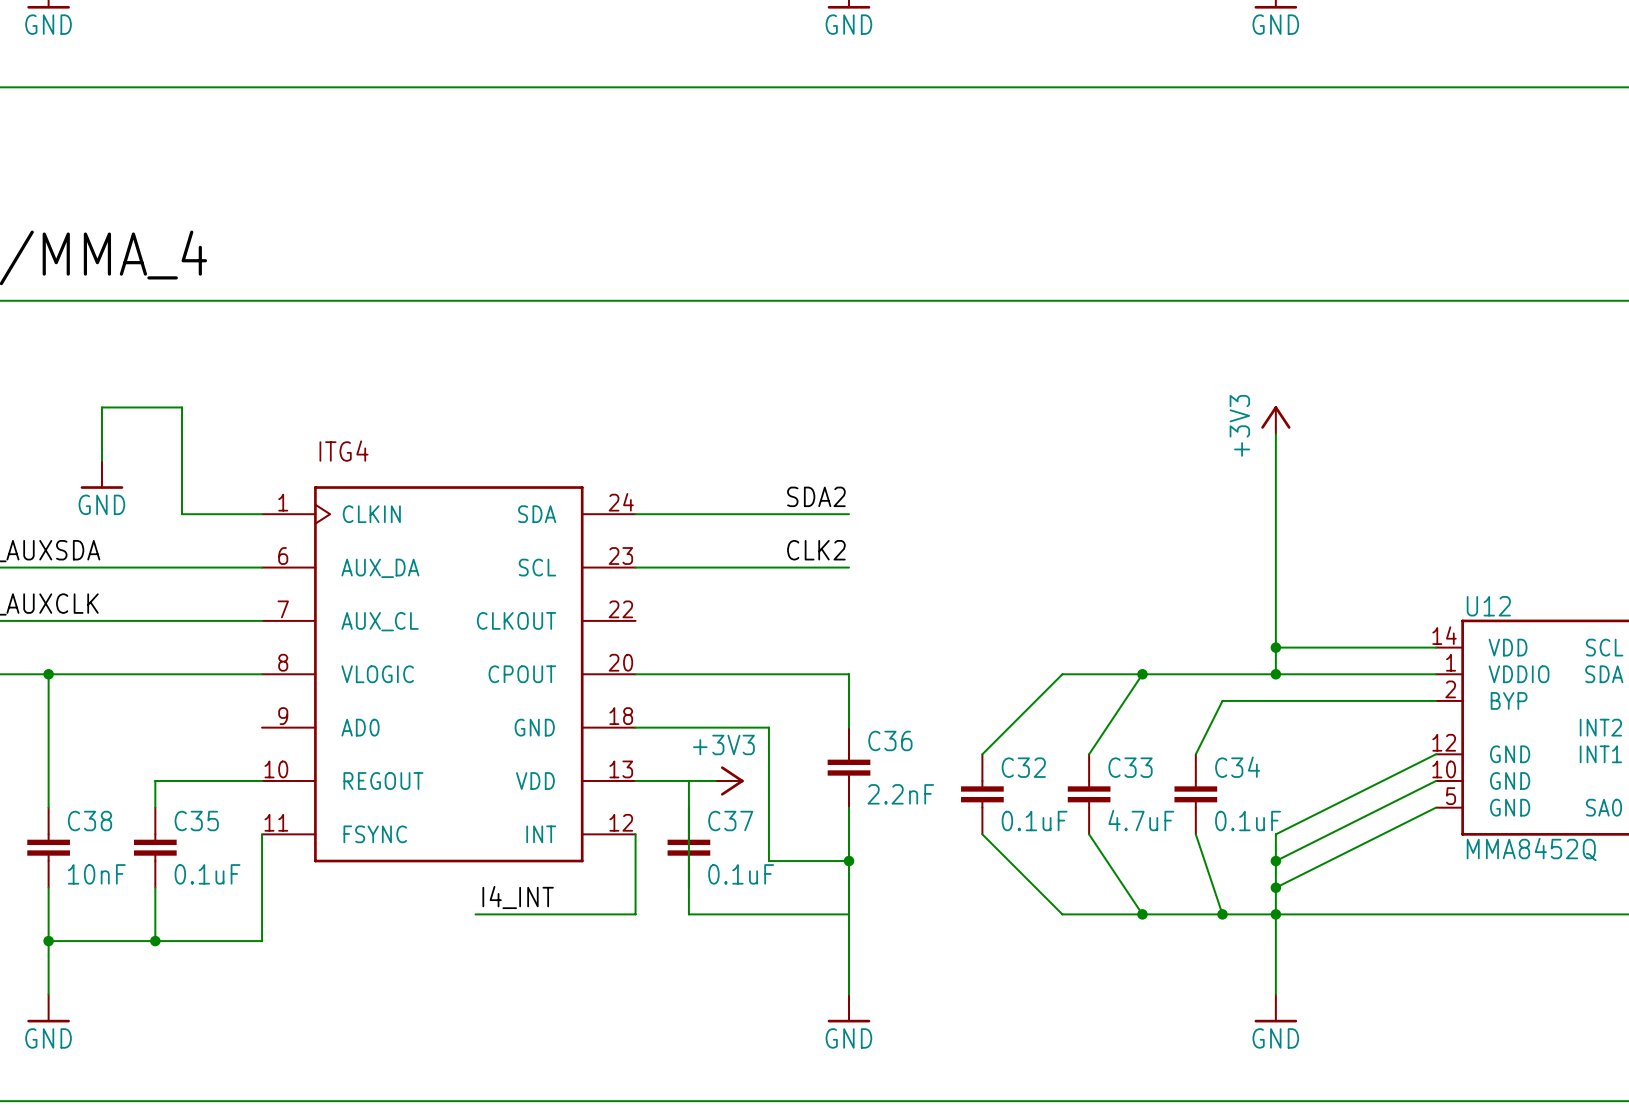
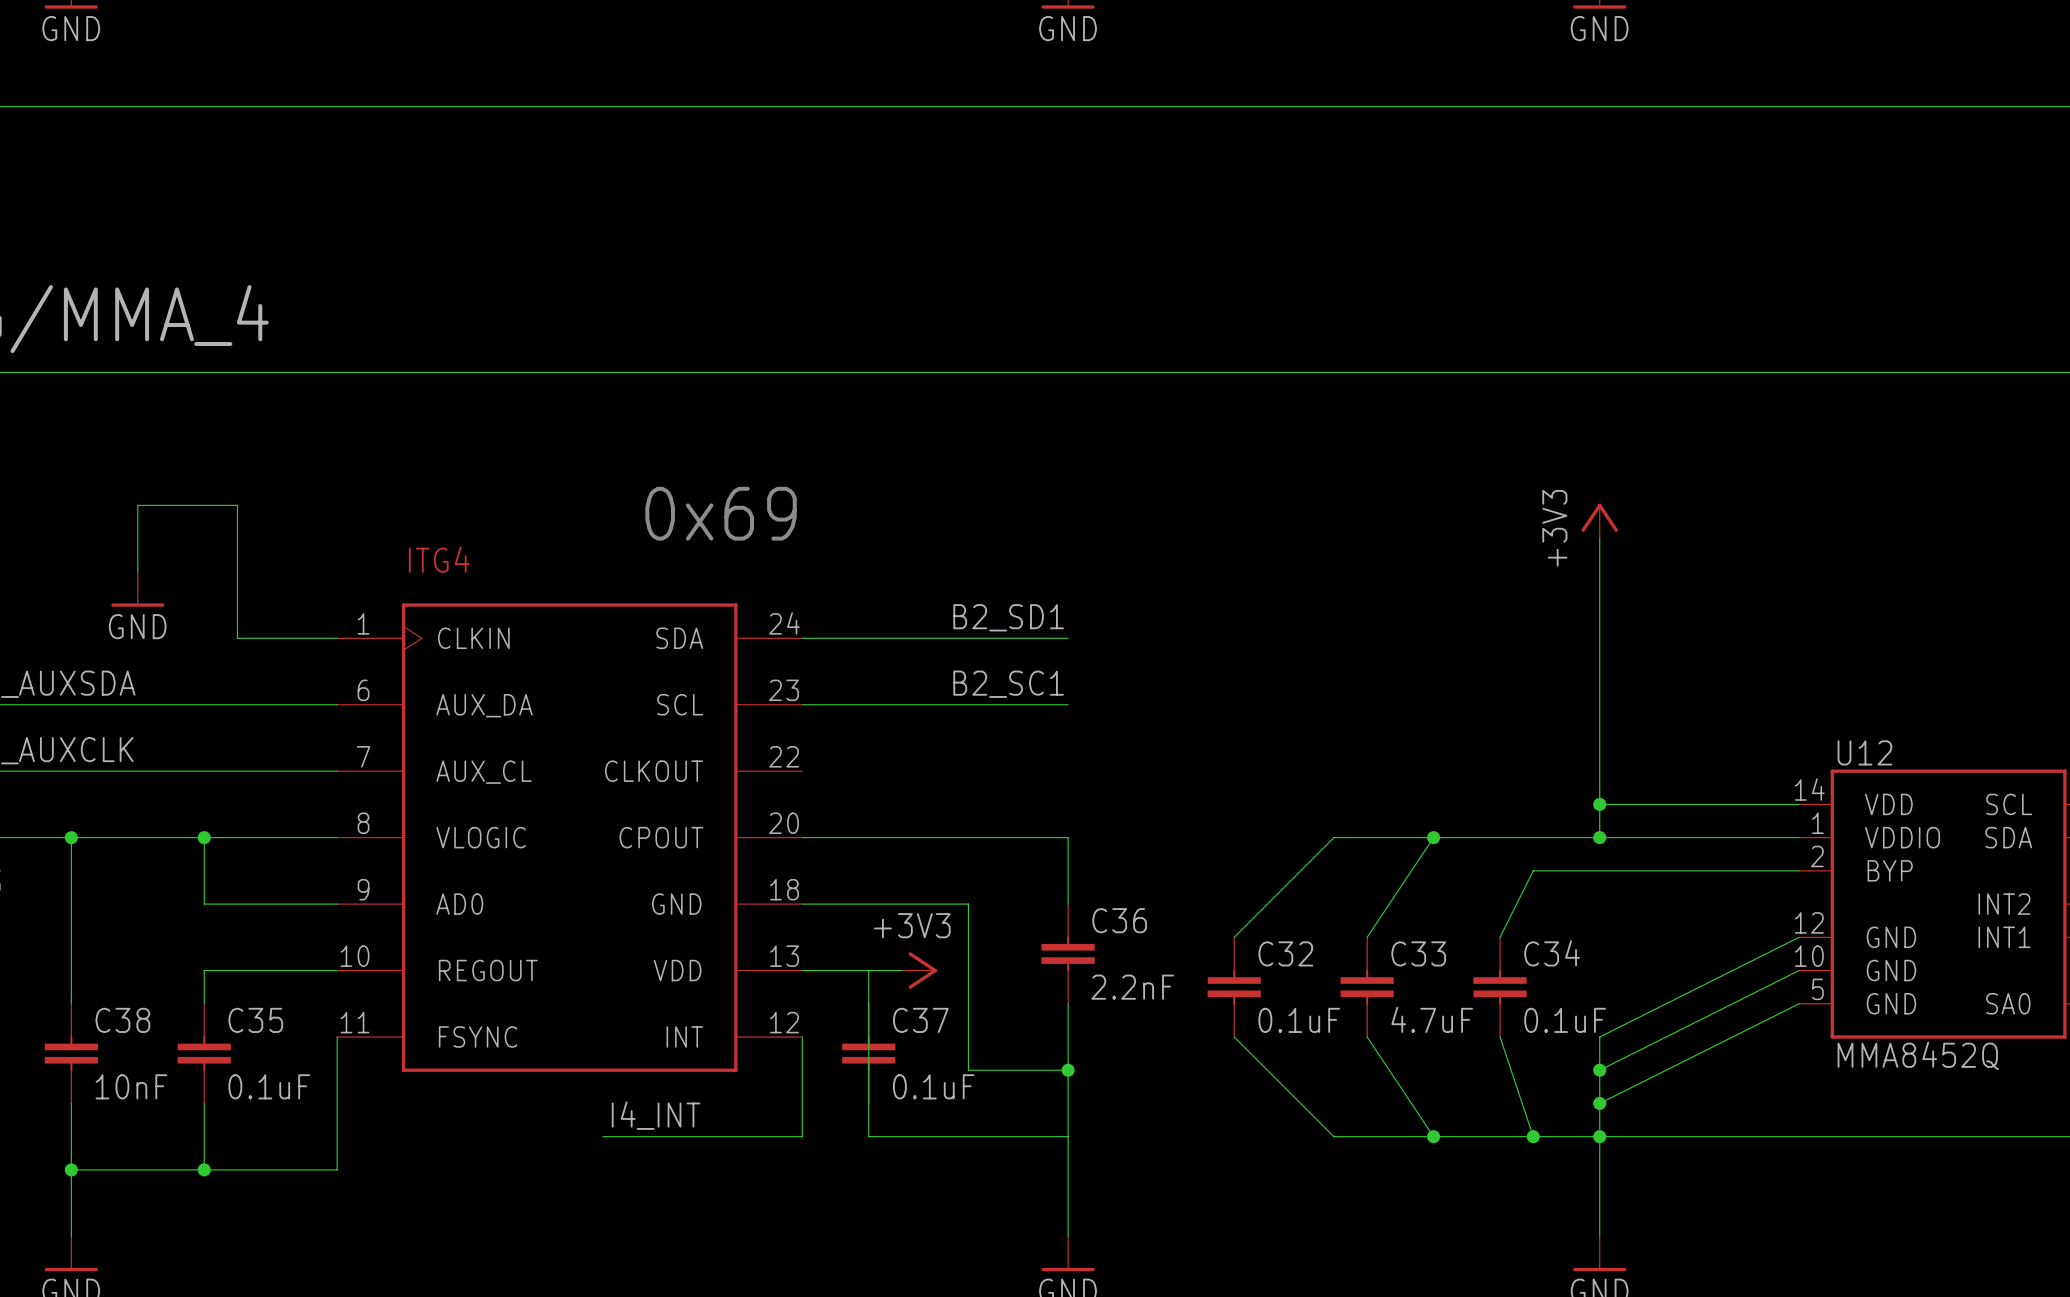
text: none -> 0x69 (721, 513)
label: SDA2 (816, 496) -> B2_SD1 (1008, 617)
label: CLK2 (816, 550) -> B2_SC1 (1008, 684)
wire: none -> (204, 837) (204, 904) (337, 904)
junction: none -> (204, 837)

